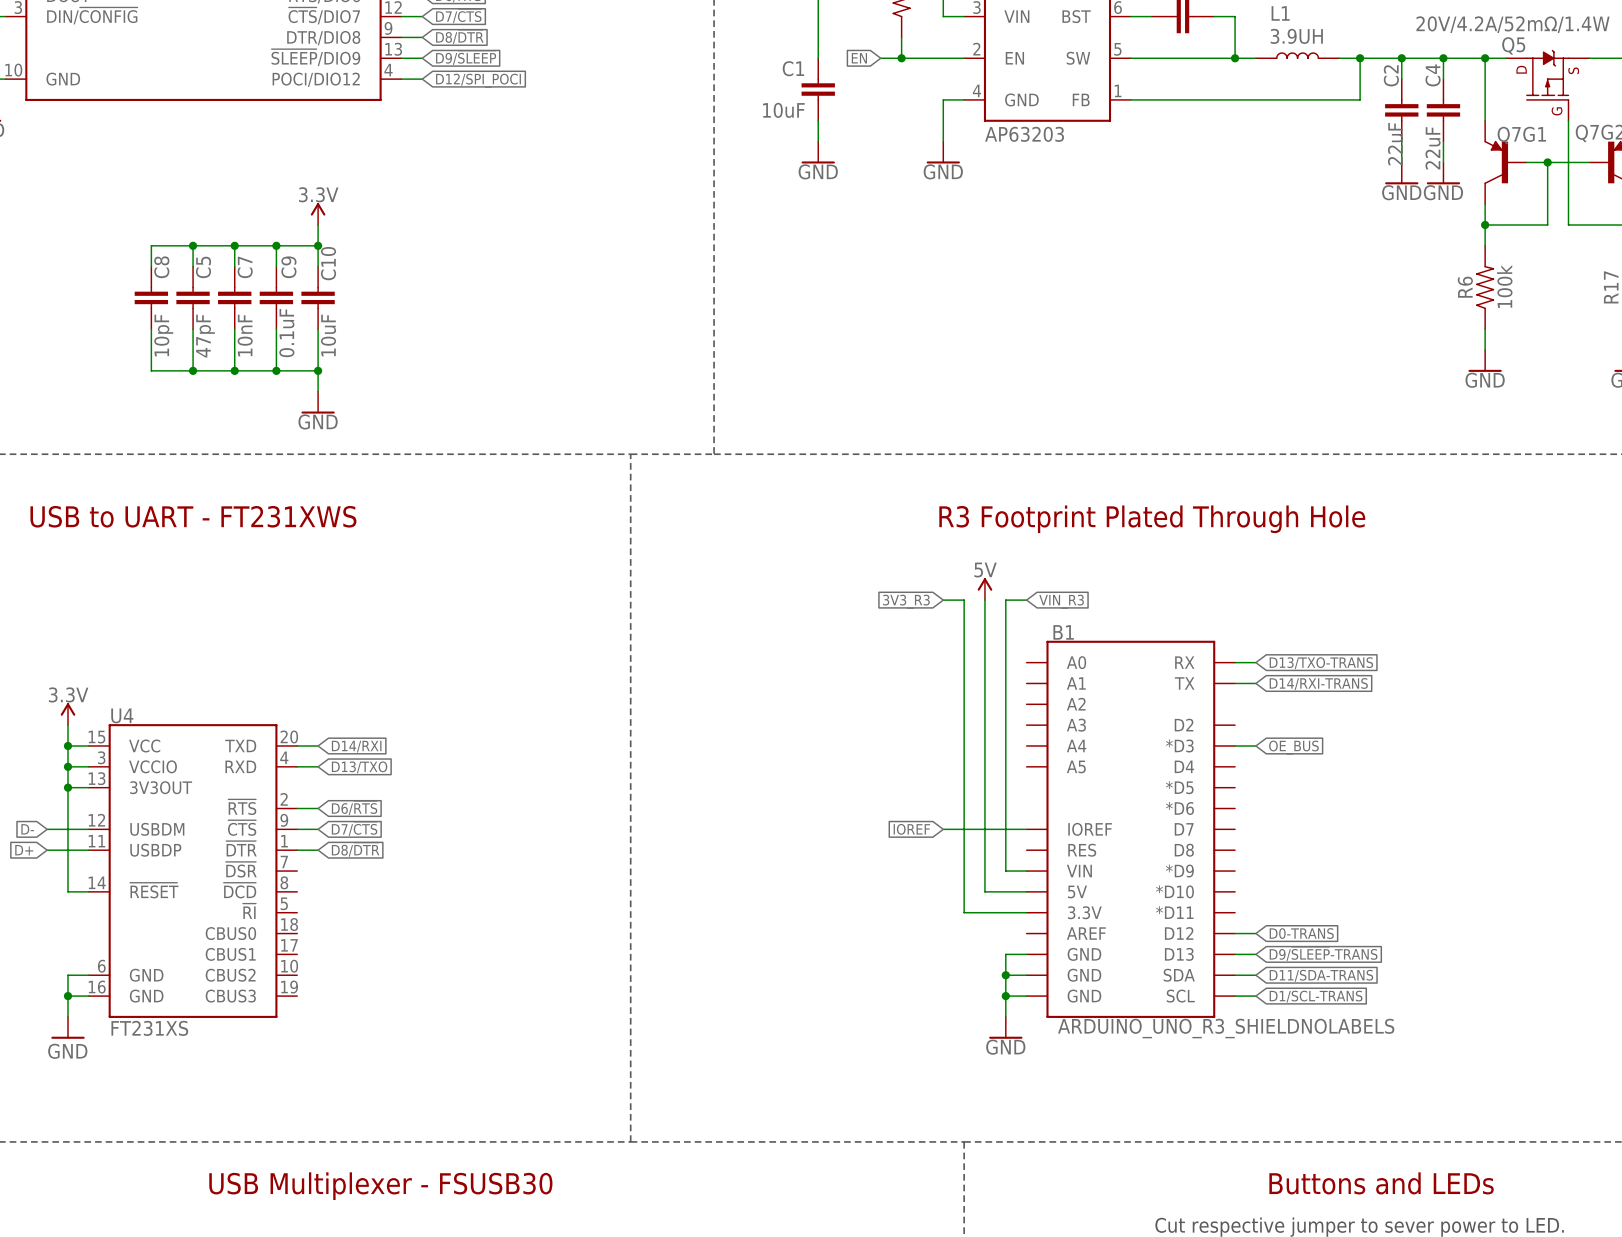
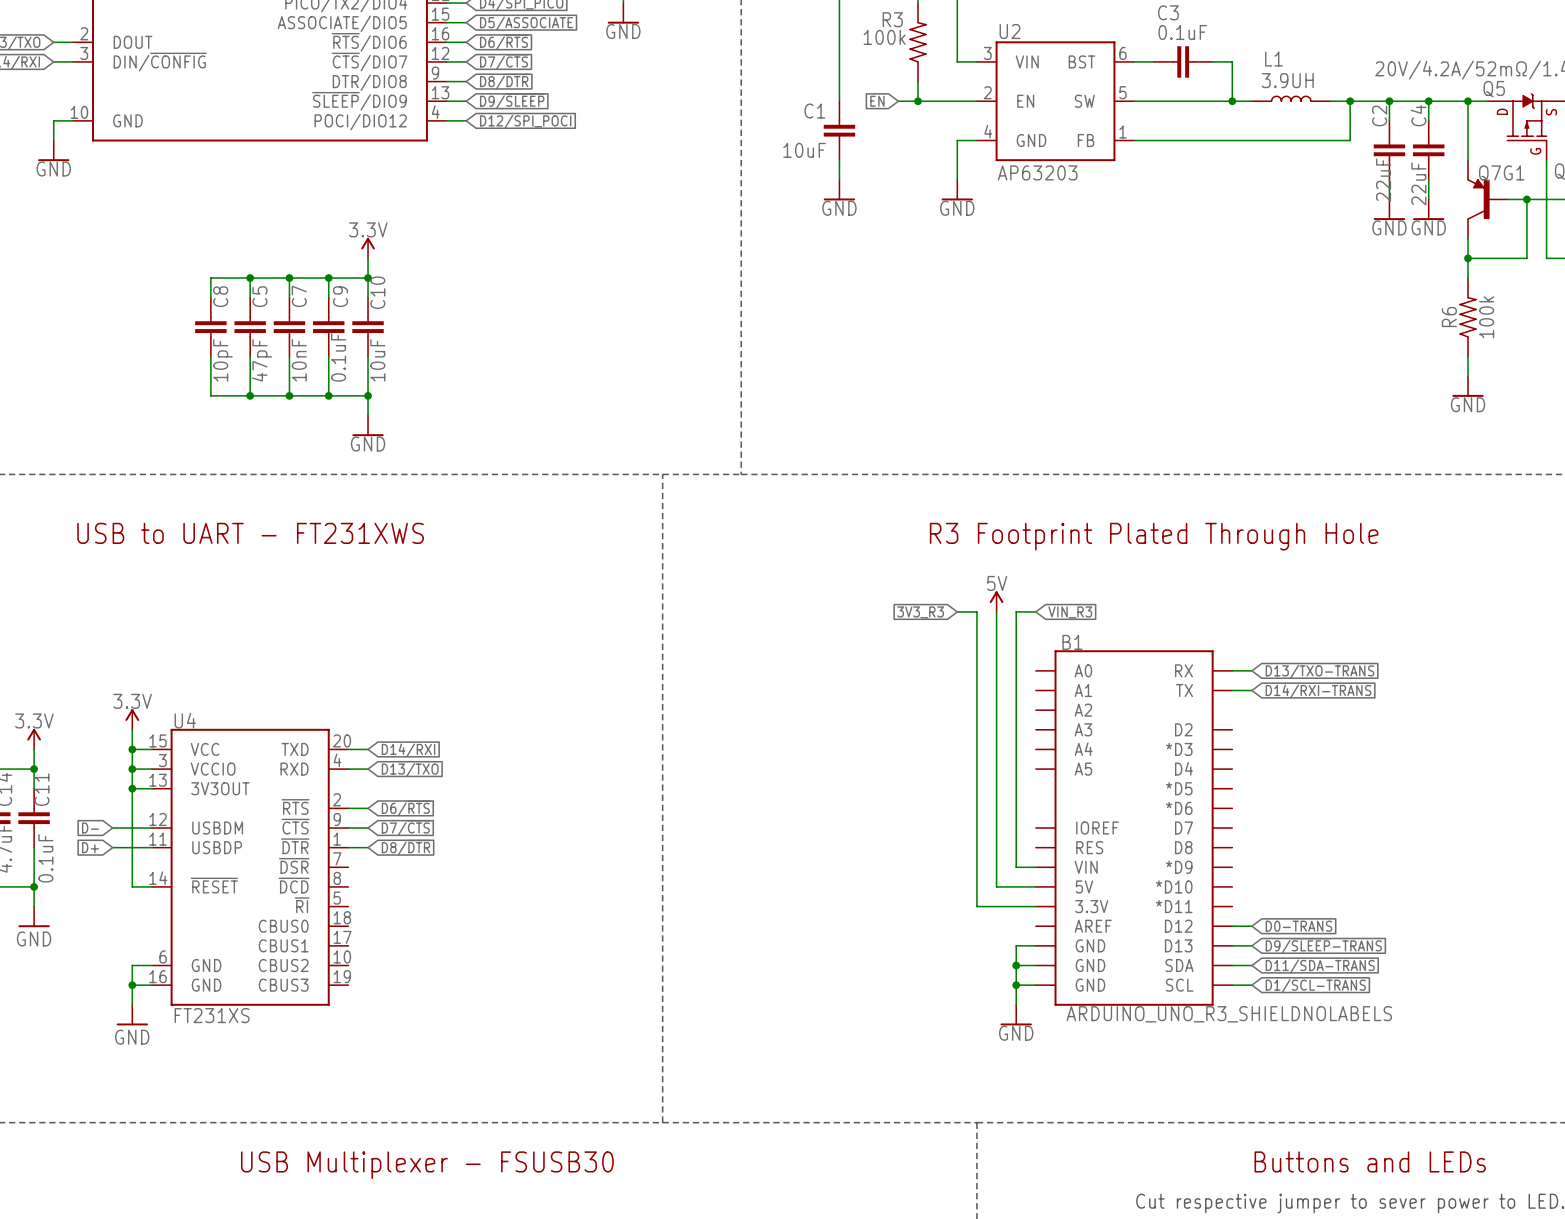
wire: (1235, 745) (1255, 745) -> none
global label: OE_BUS (1293, 747) -> none
global label: IOREF (911, 829) -> none
wire: (943, 829) (1026, 829) -> none

